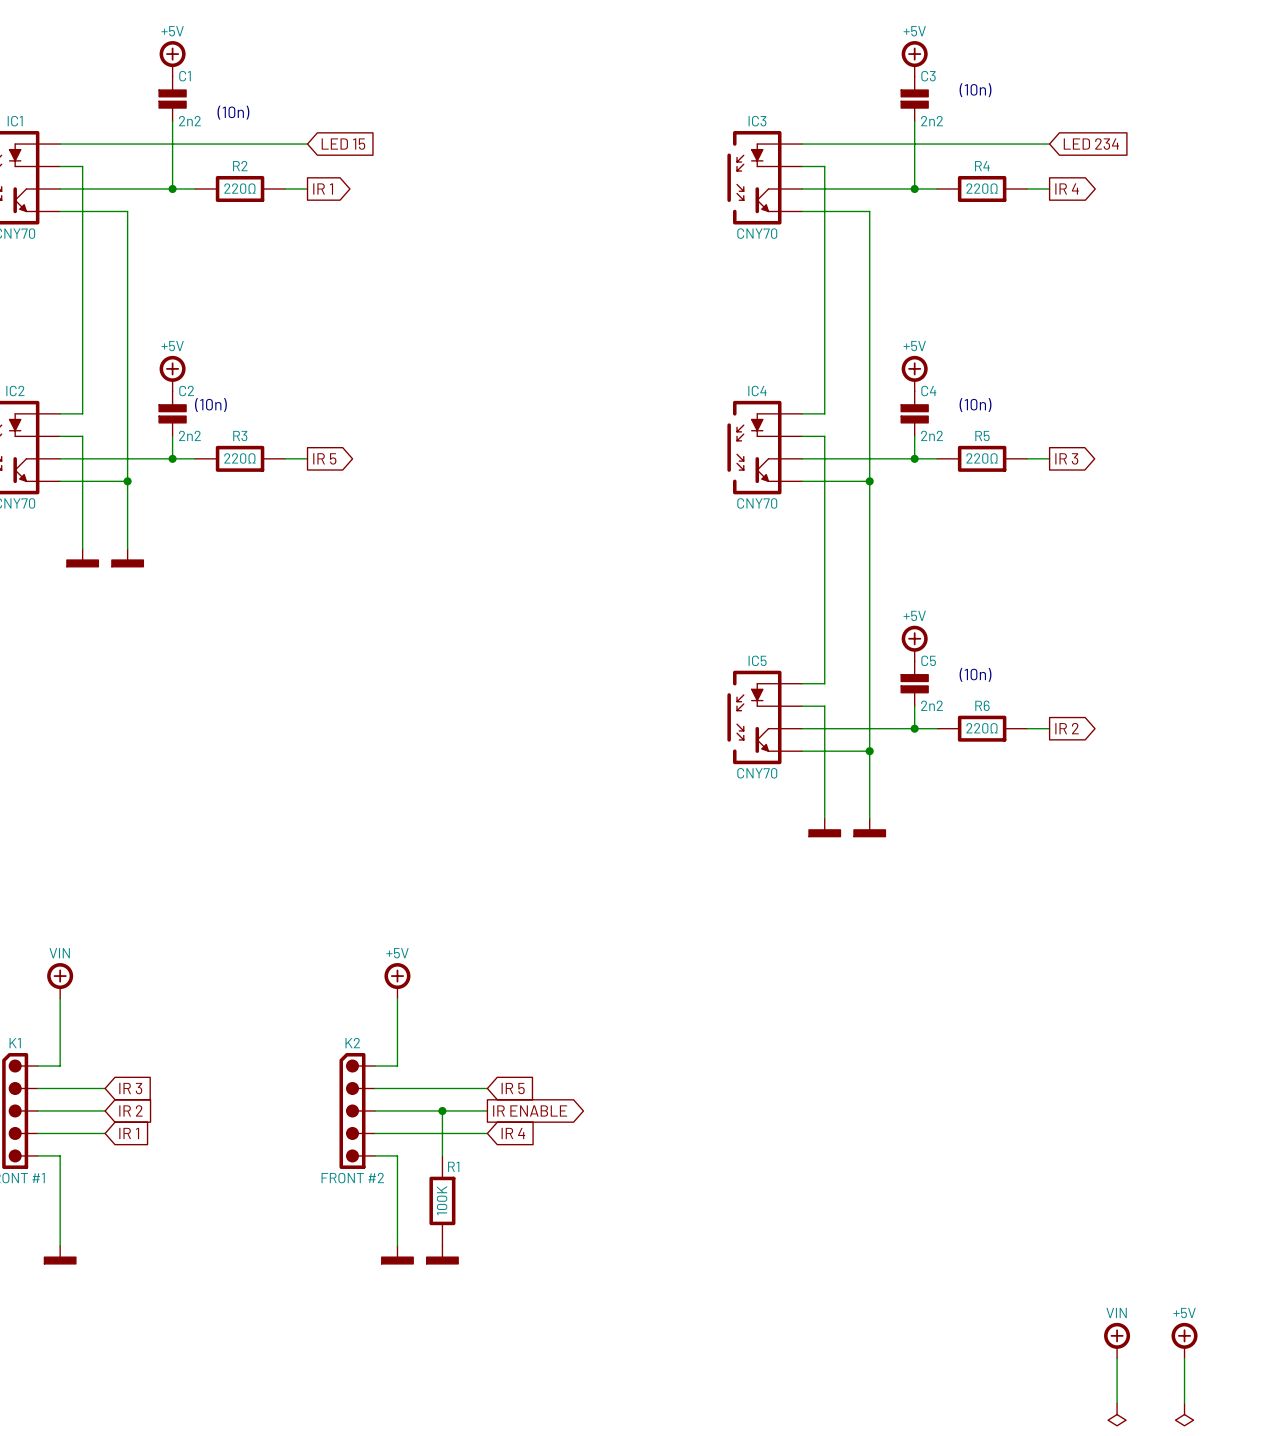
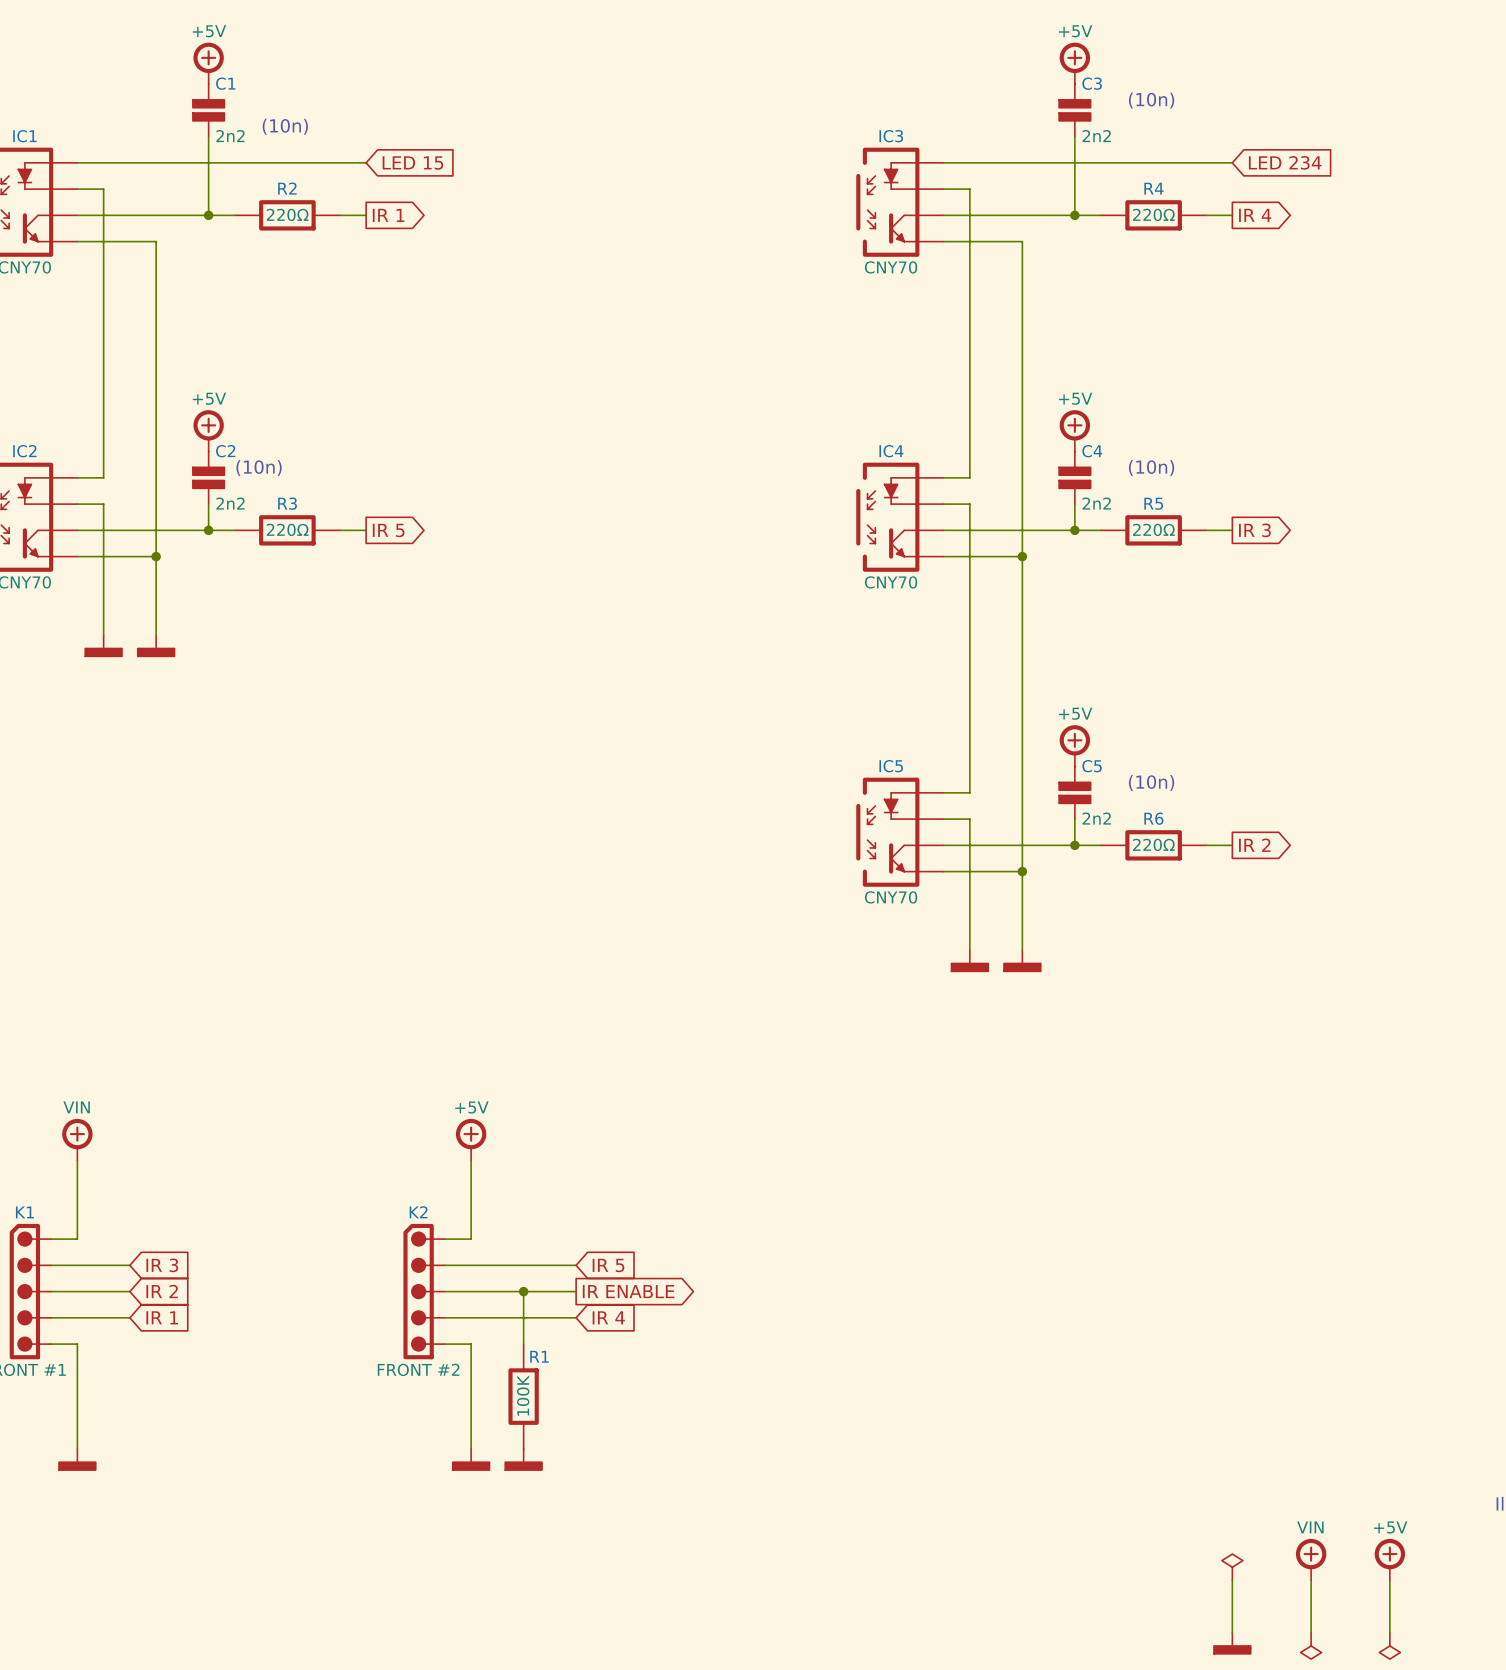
power symbol: none -> (1232, 1567)
wire: none -> (1232, 1580) (1232, 1632)
power symbol: none -> (1232, 1643)

